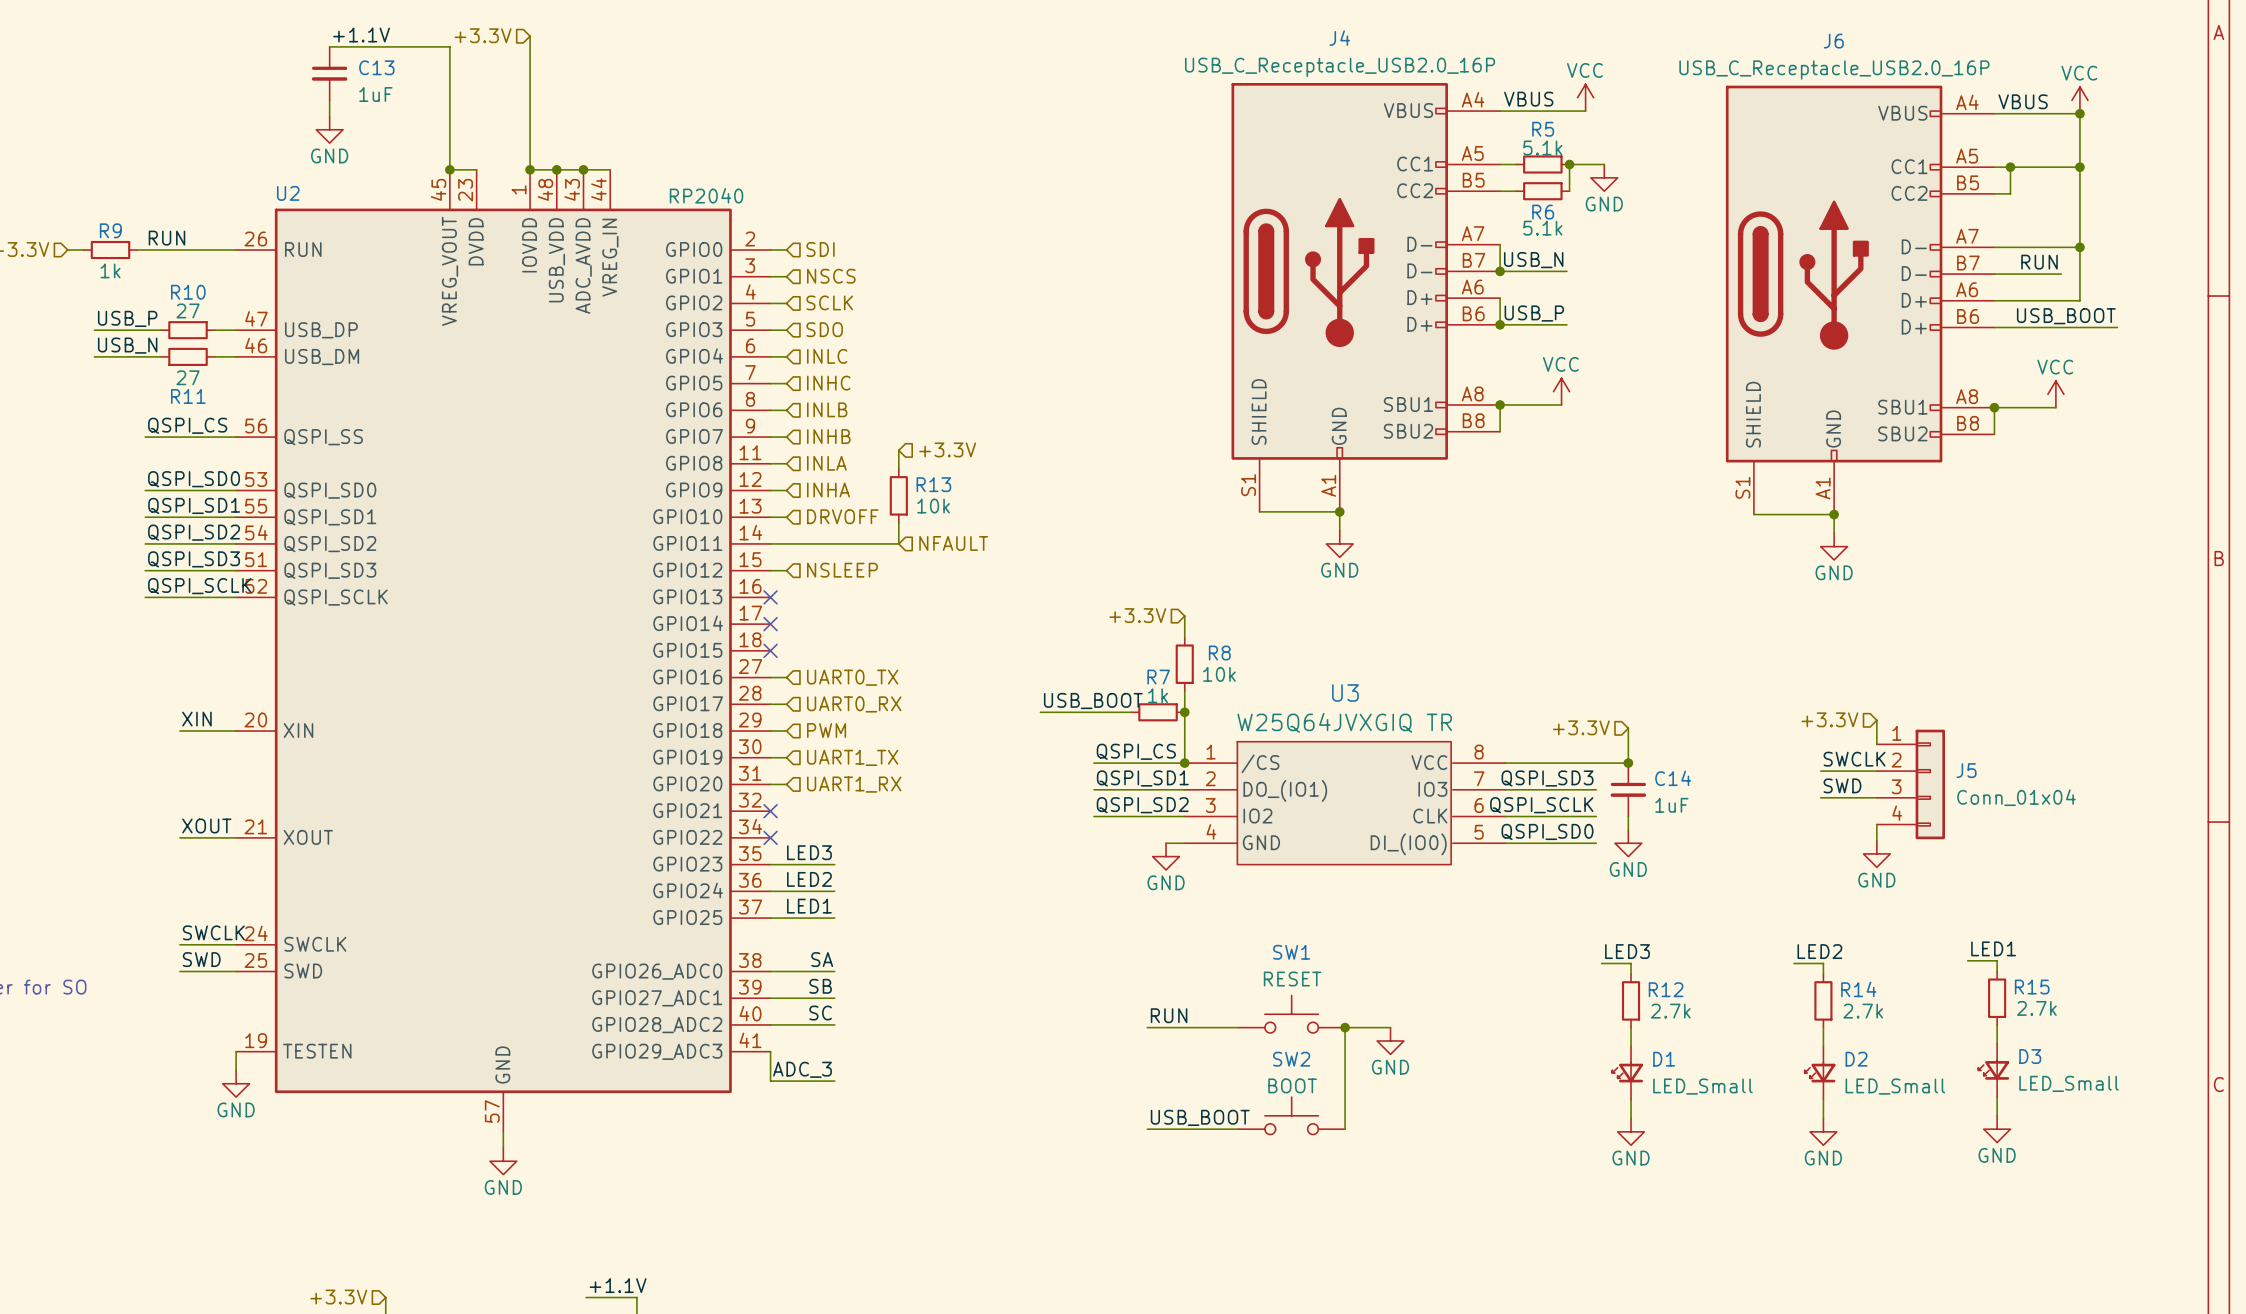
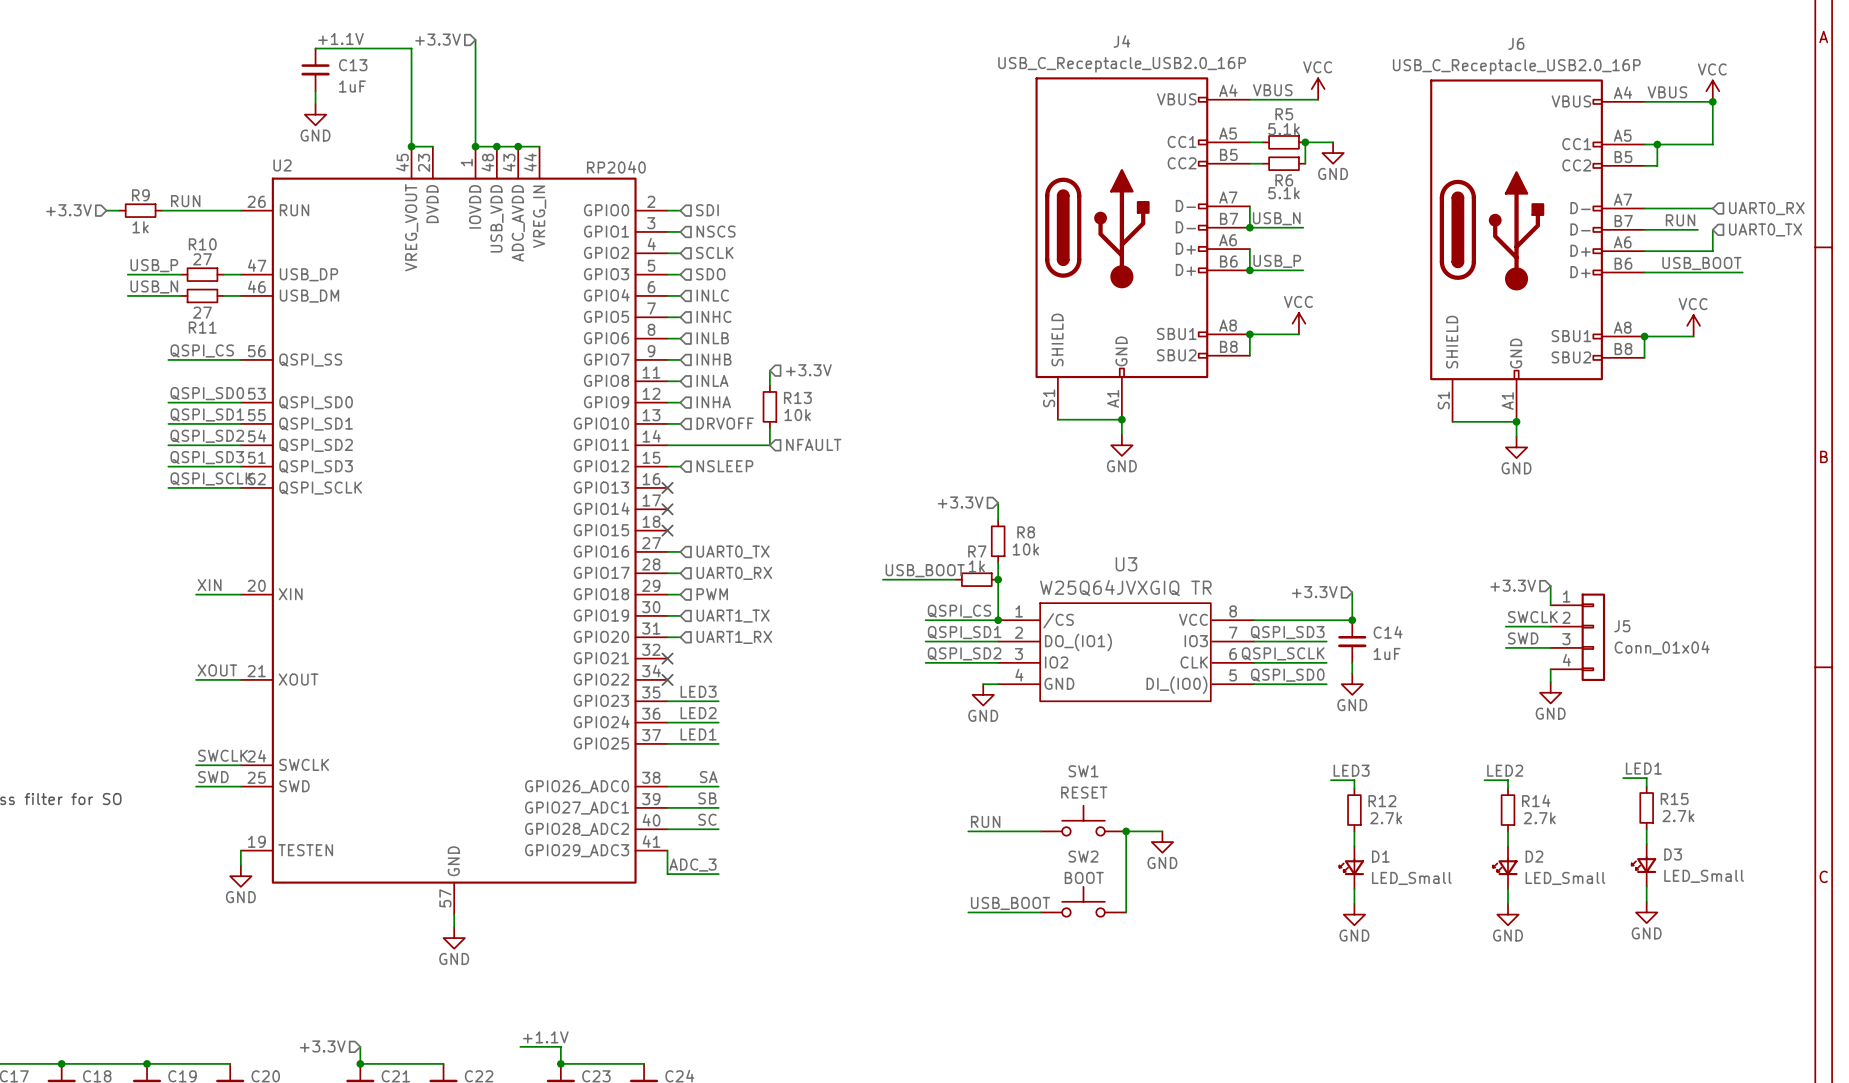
wire: (2079, 167) (2079, 274) -> none
junction: (2079, 167) -> none
junction: (2079, 247) -> none
hierarchical label: none -> UART0_RX (1766, 208)
hierarchical label: none -> UART0_TX (1765, 229)

